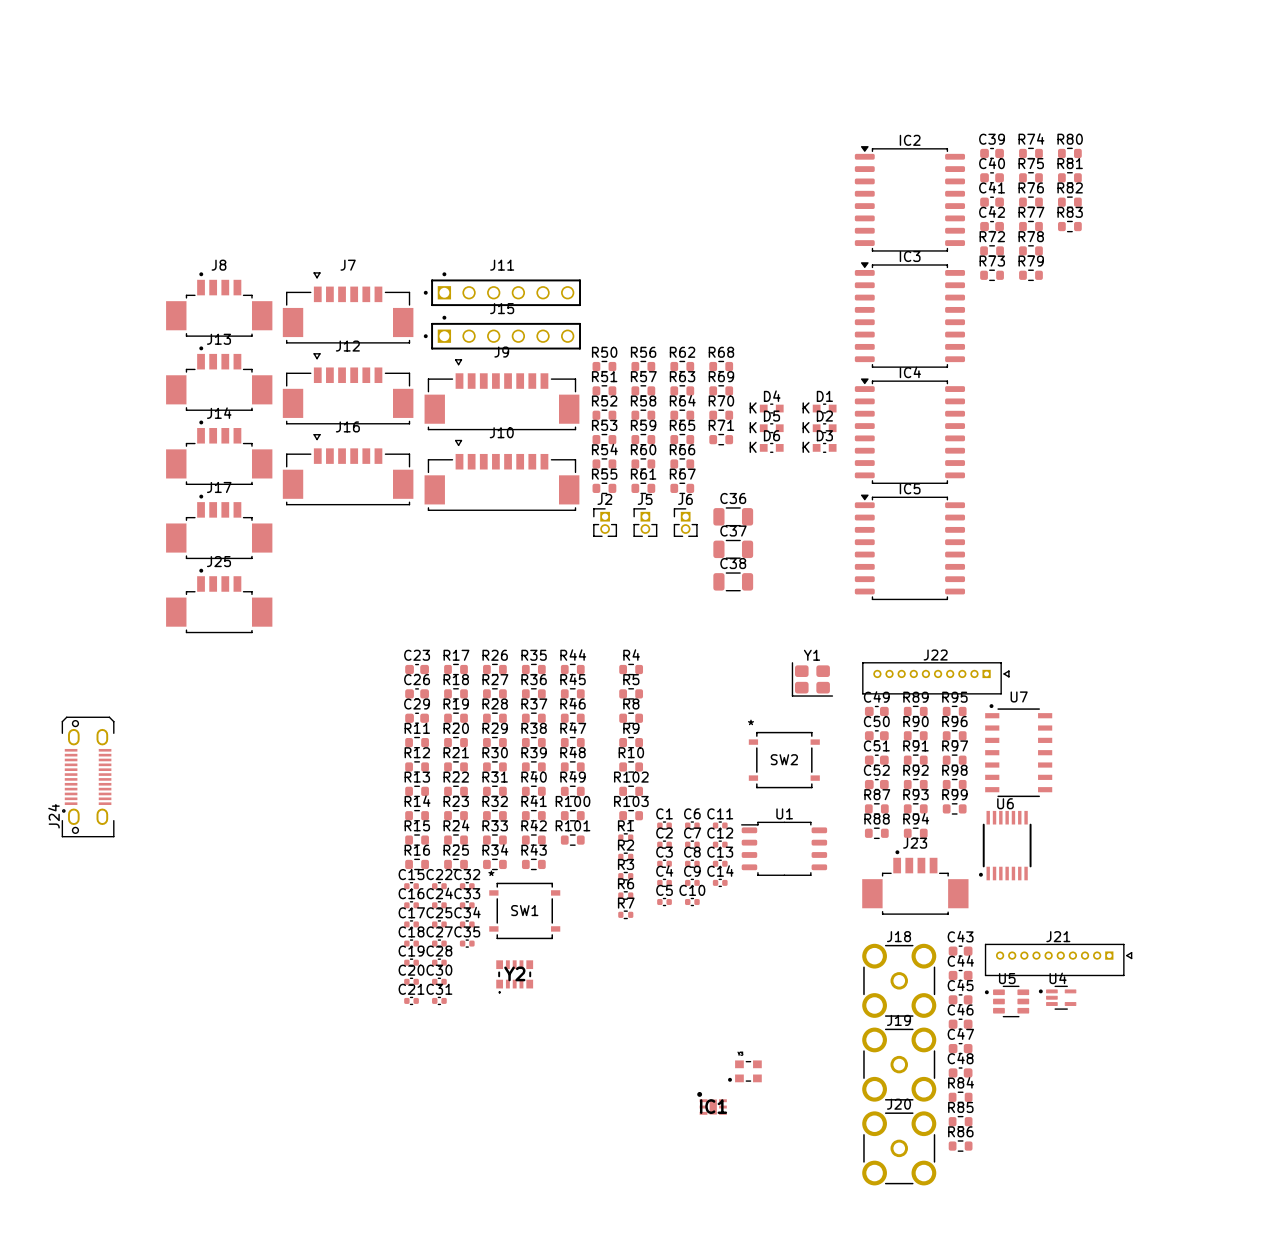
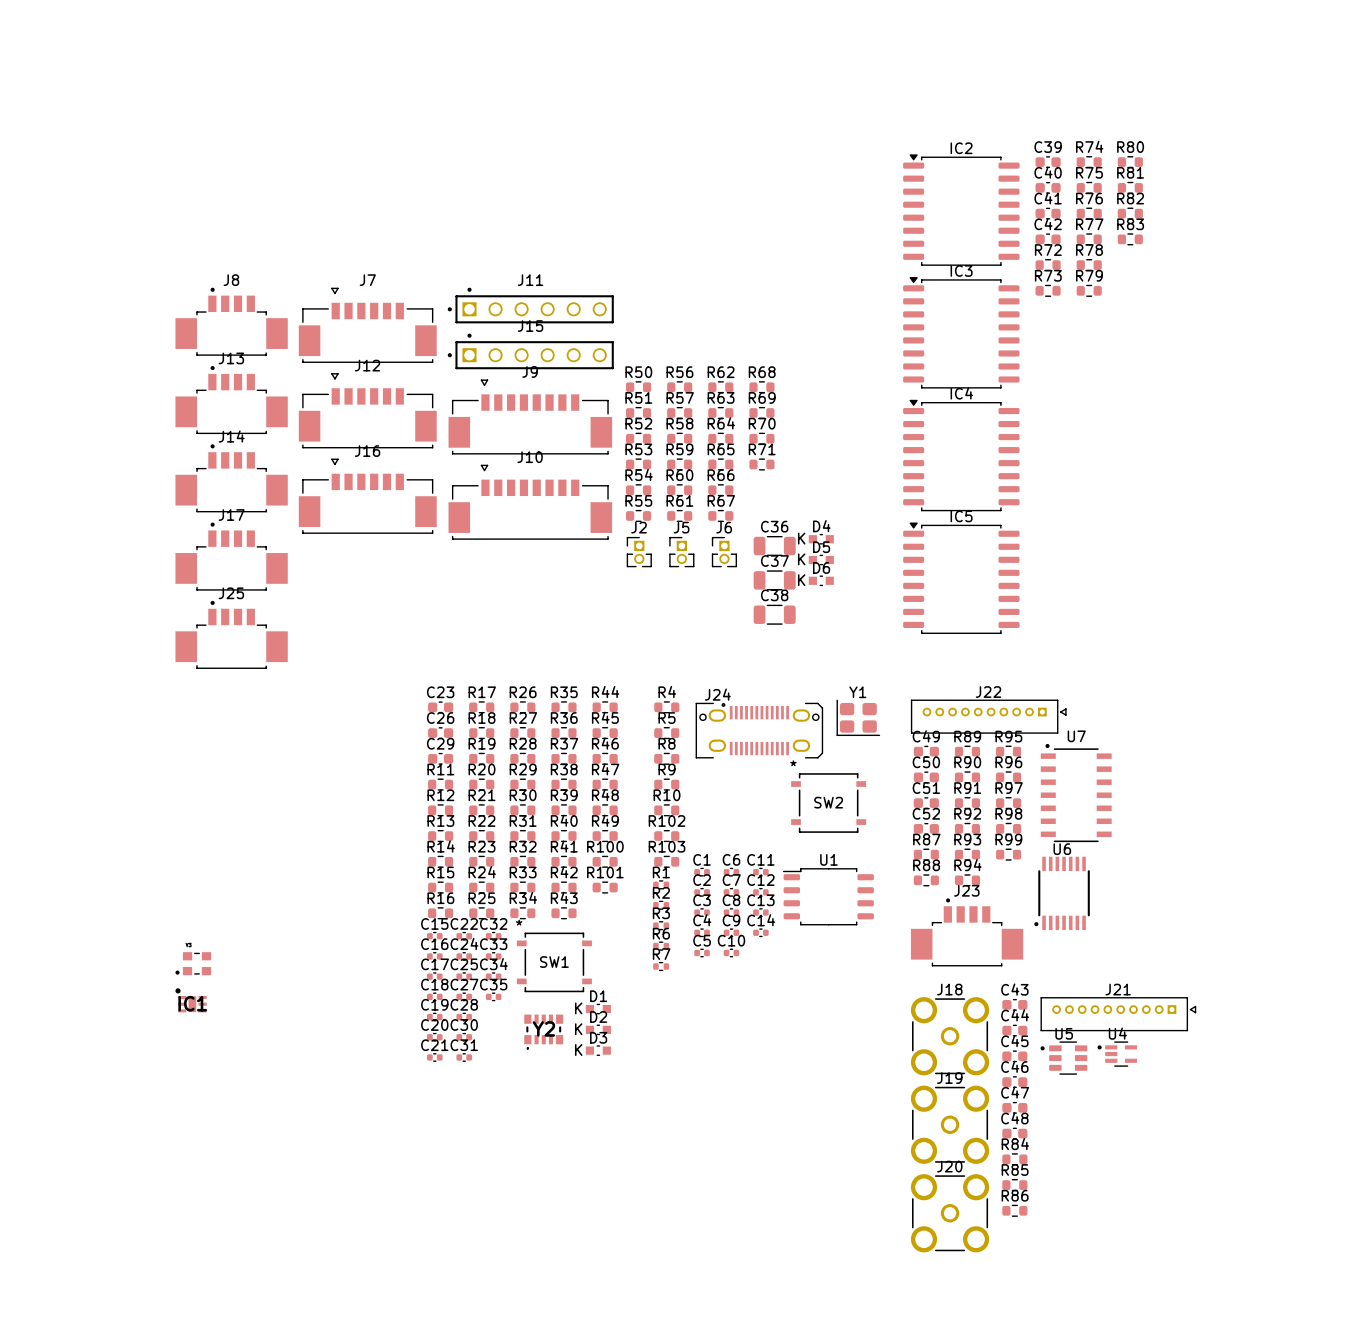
D4 position: (771, 408) -> (821, 539)
D1 position: (824, 408) -> (598, 1009)
D5 position: (771, 428) -> (821, 560)
D2 position: (824, 428) -> (598, 1029)
D6 position: (771, 447) -> (821, 580)
D3 position: (824, 447) -> (598, 1050)
J24 rotation: 0° (88, 776) -> 90° clockwise (759, 730)
J24 position: (88, 776) -> (759, 730)
part position: (744, 1071) -> (193, 963)
IC1 position: (712, 1103) -> (191, 1000)

